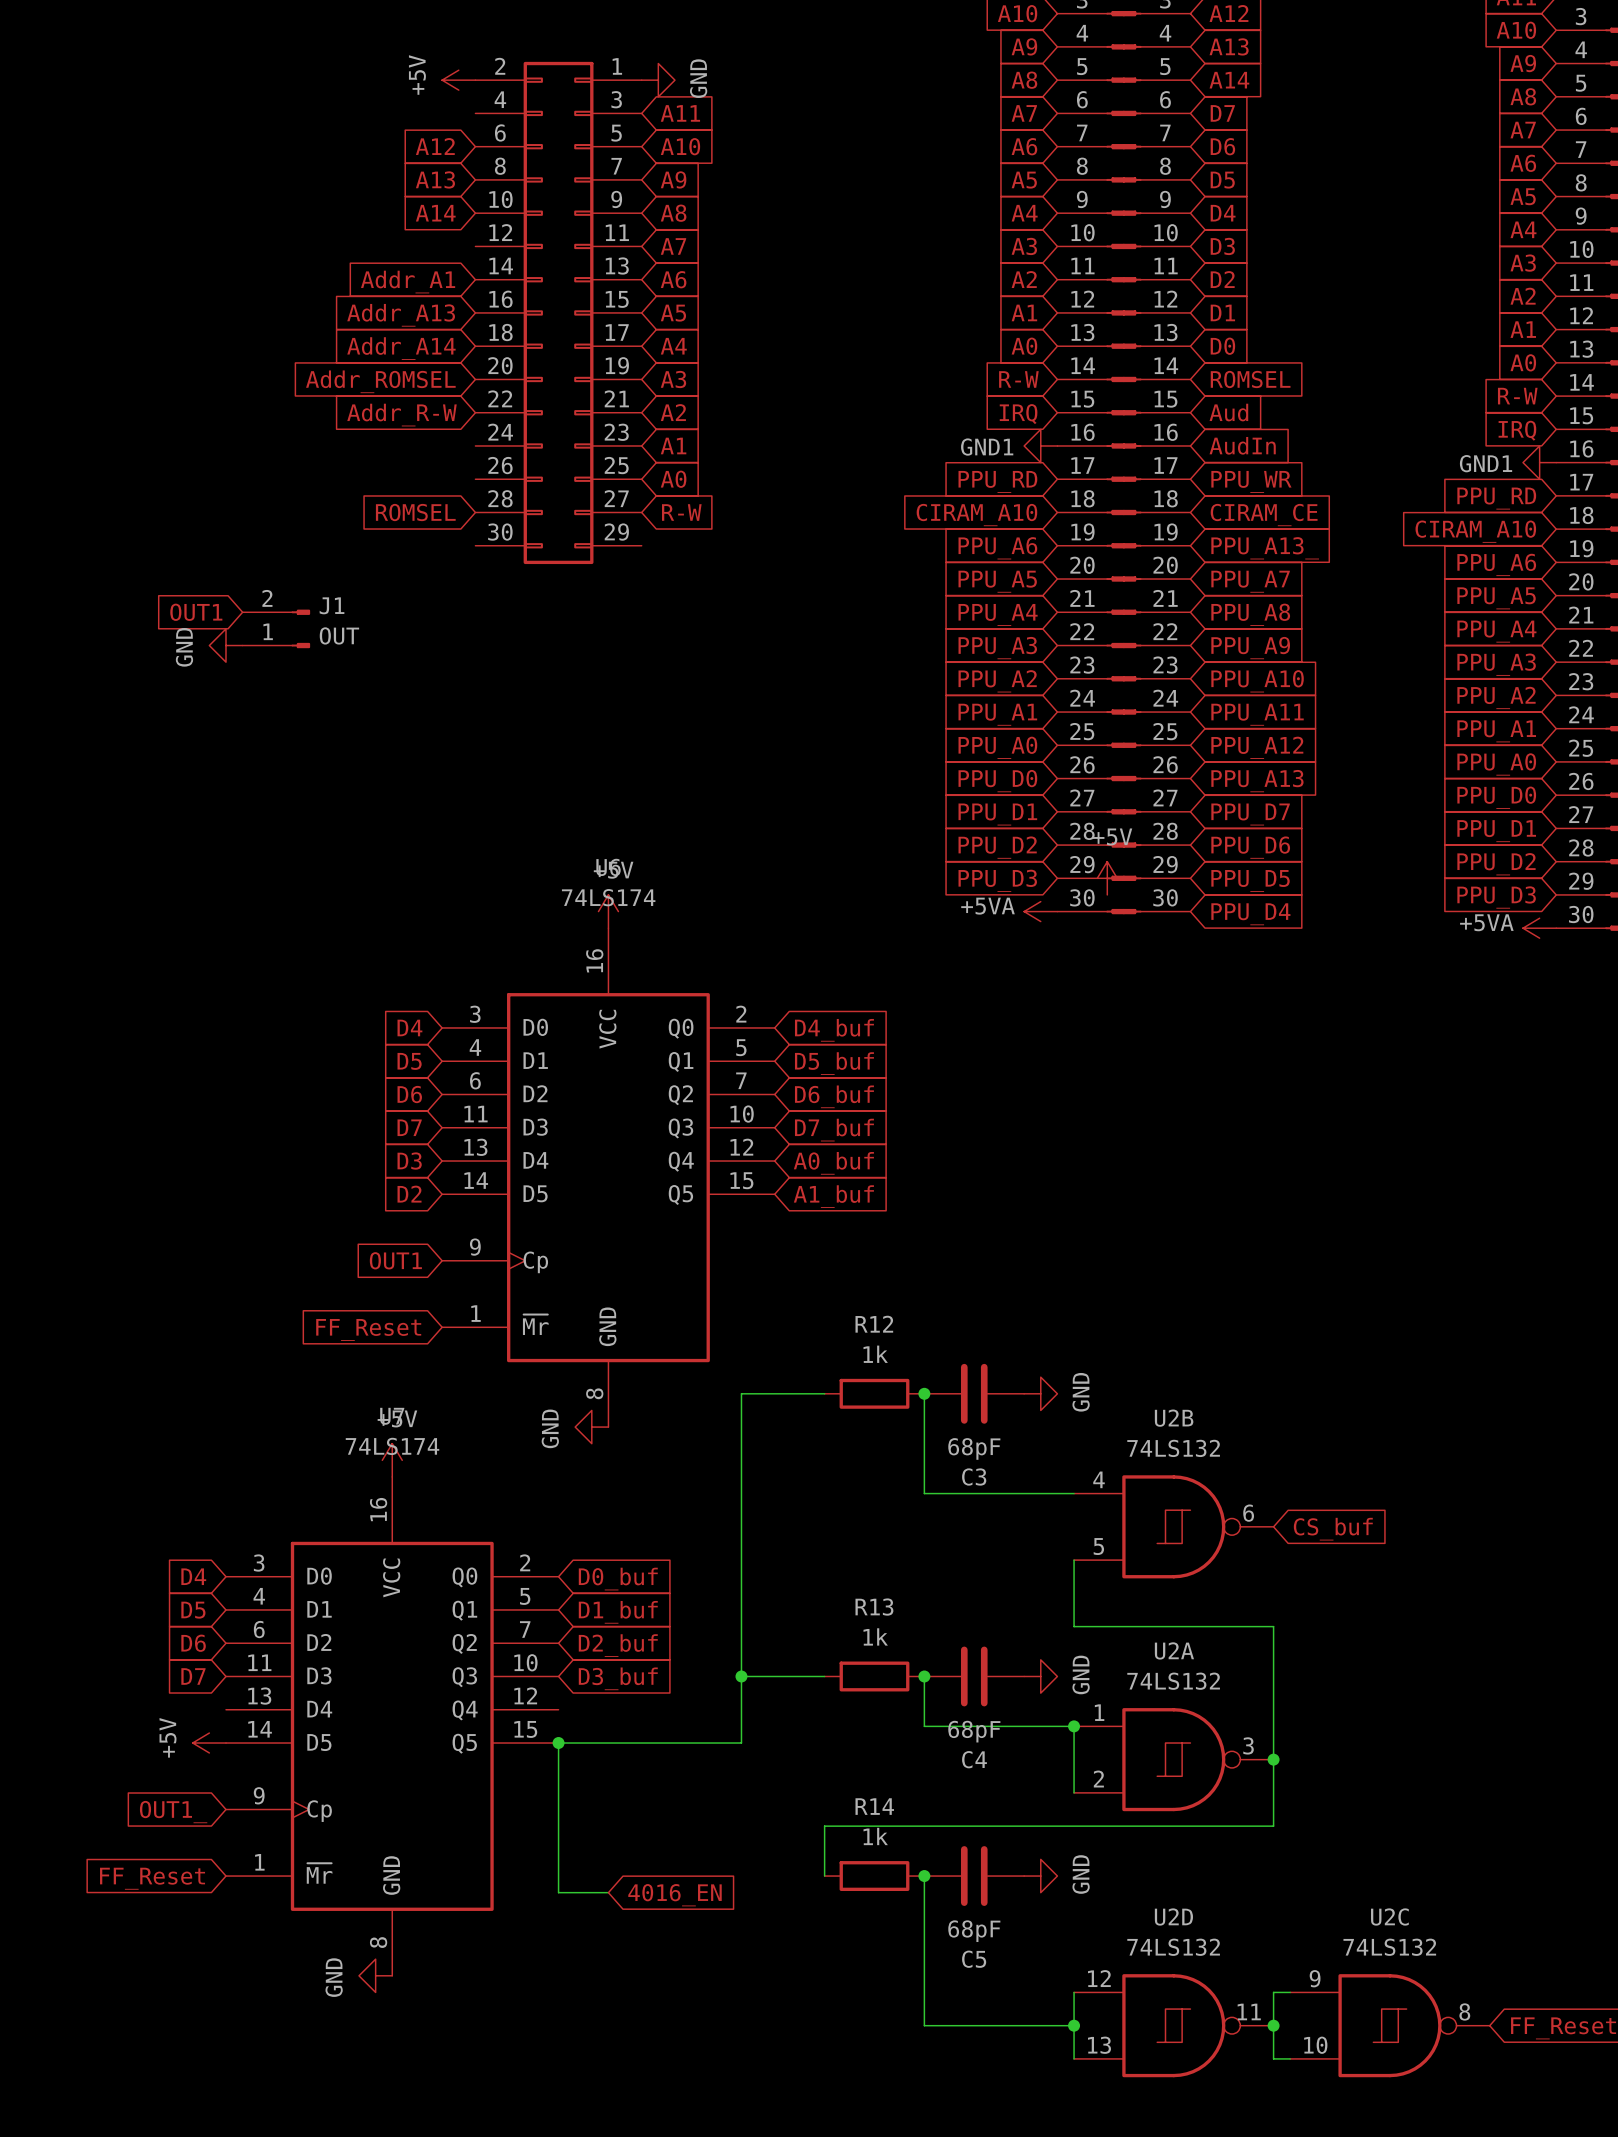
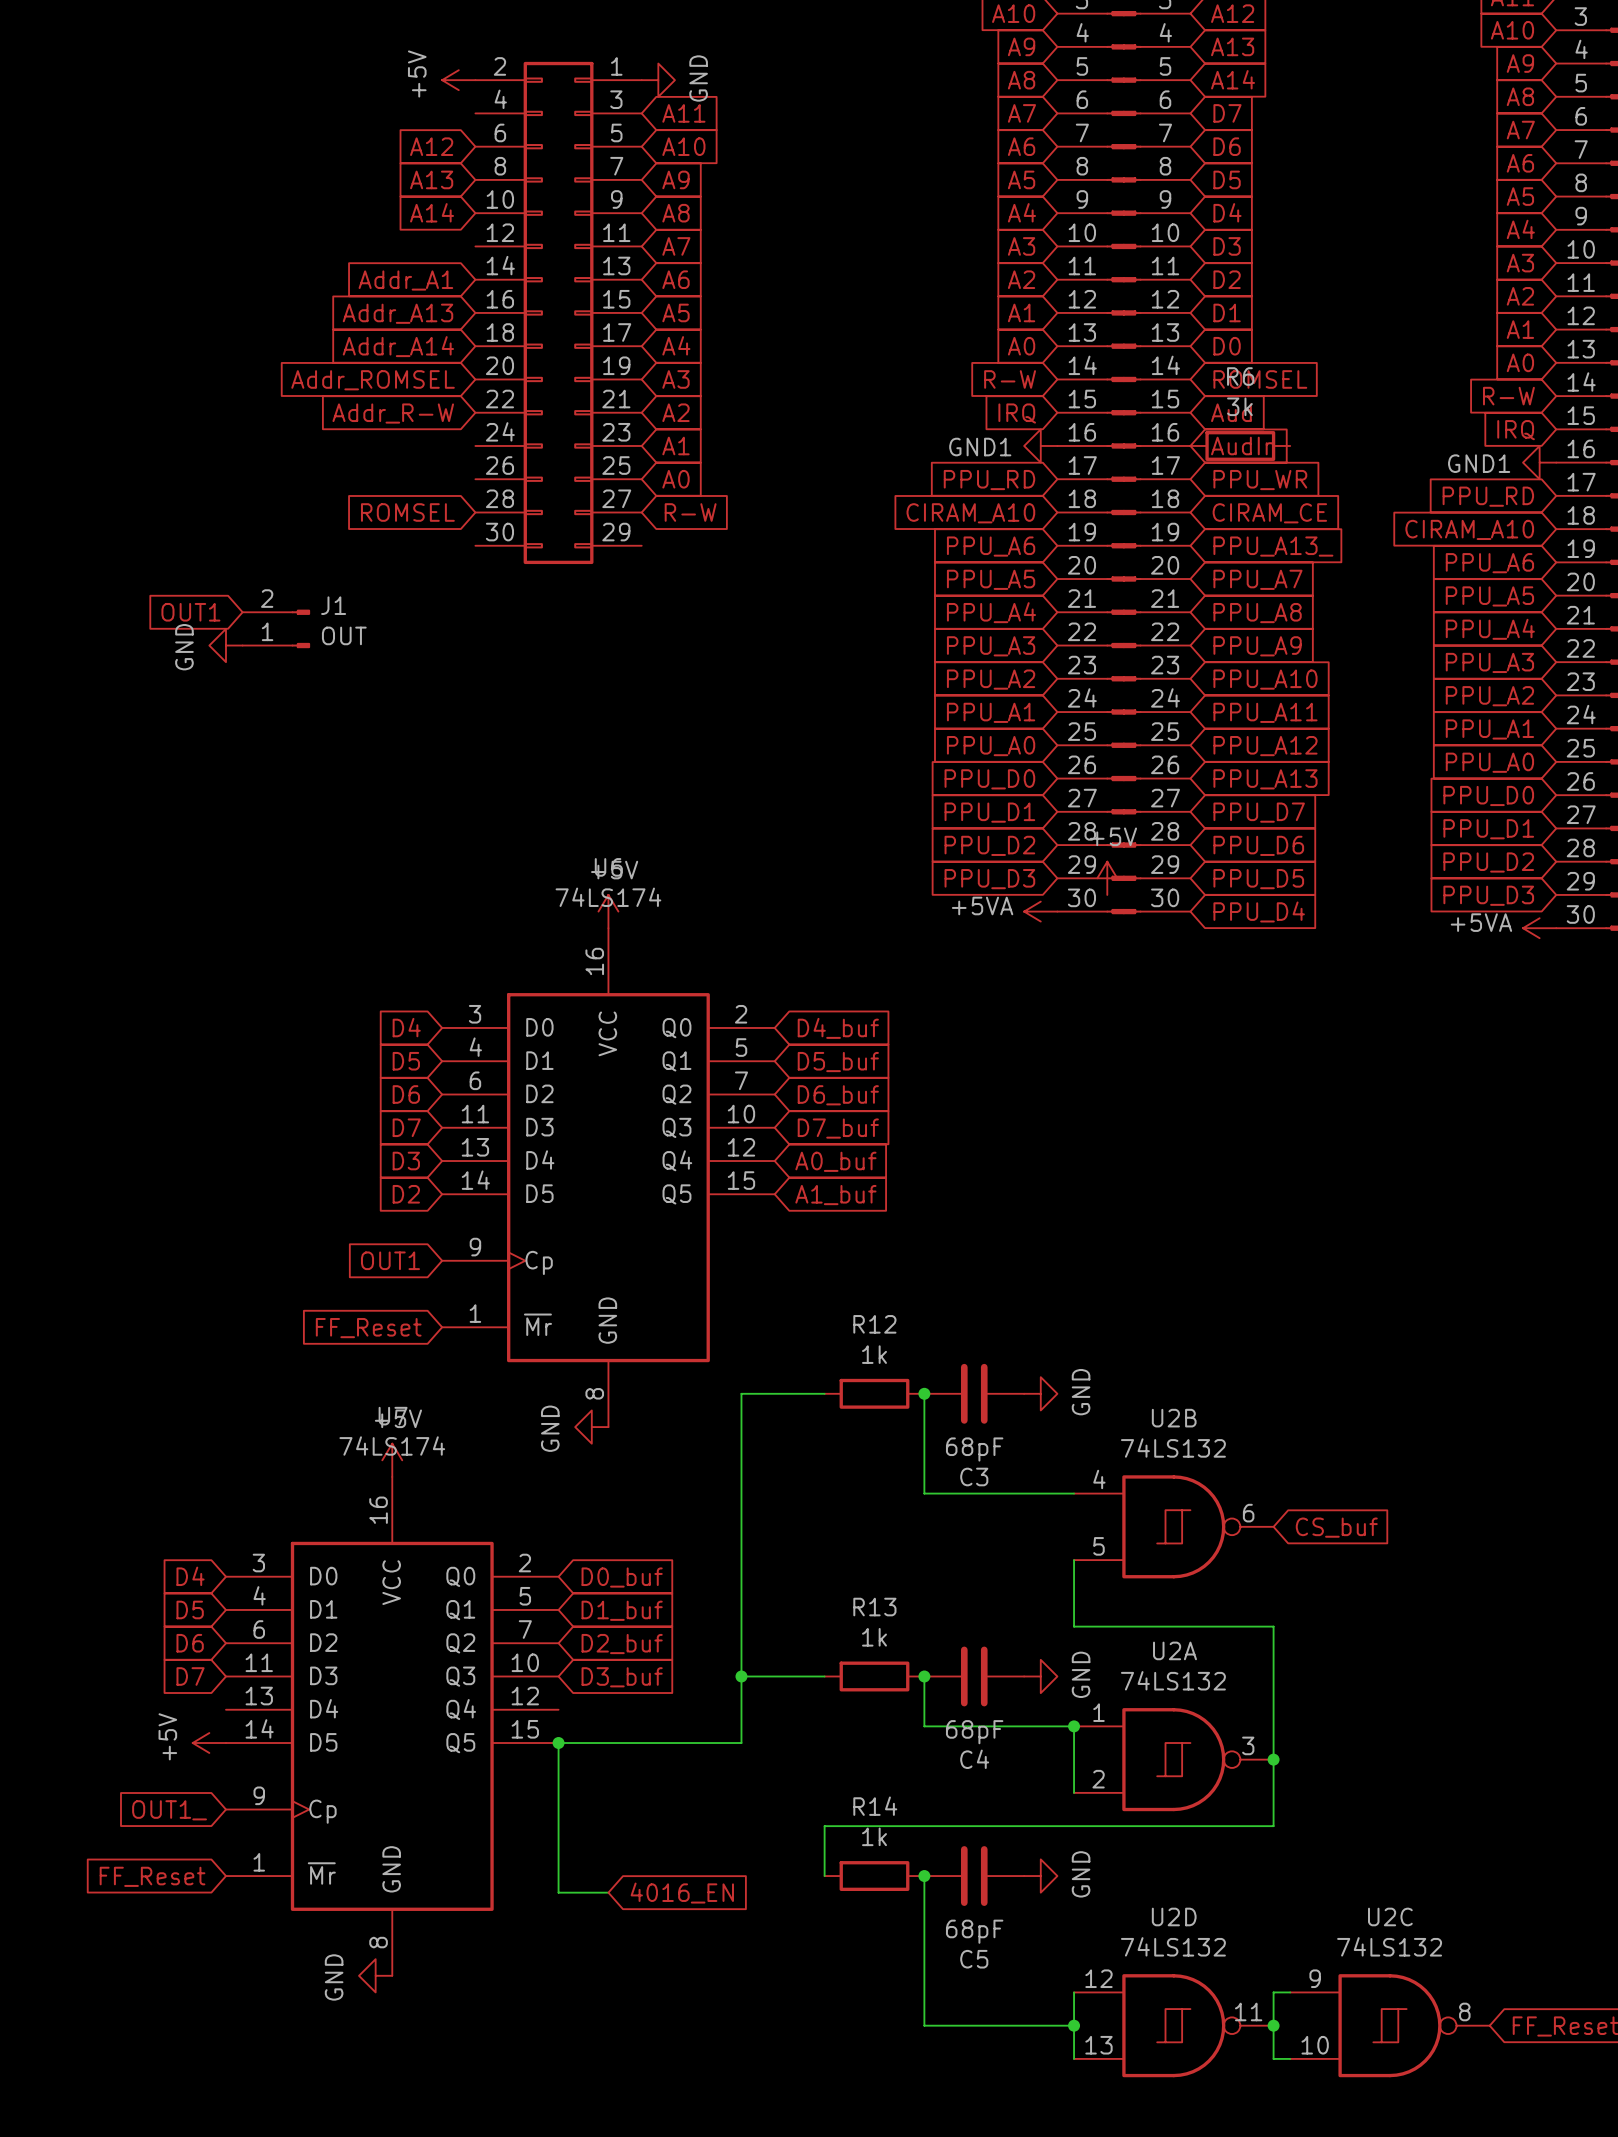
R6: none -> 3k (1240, 445)

